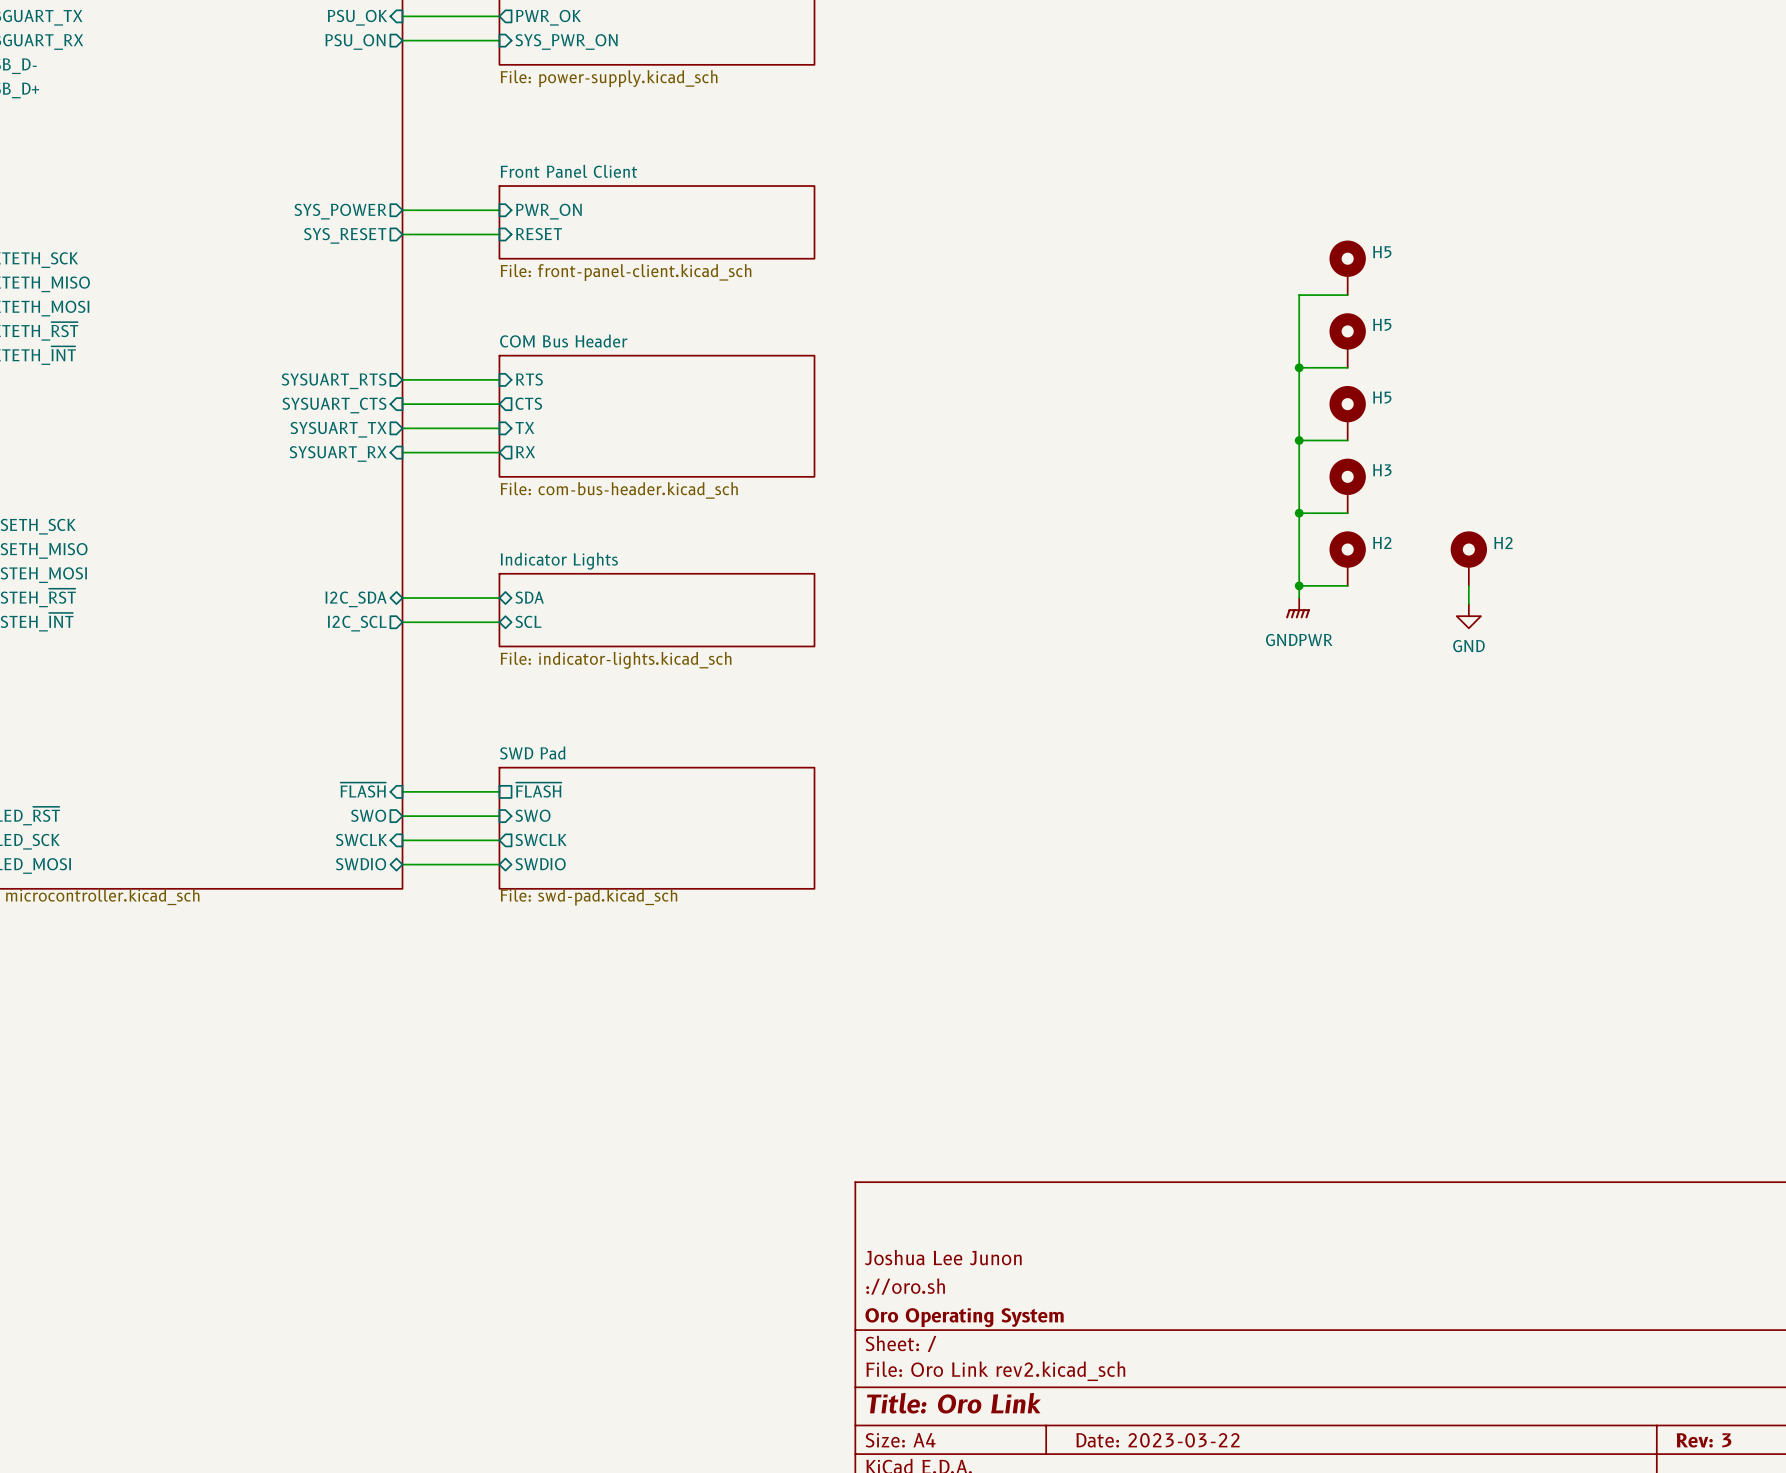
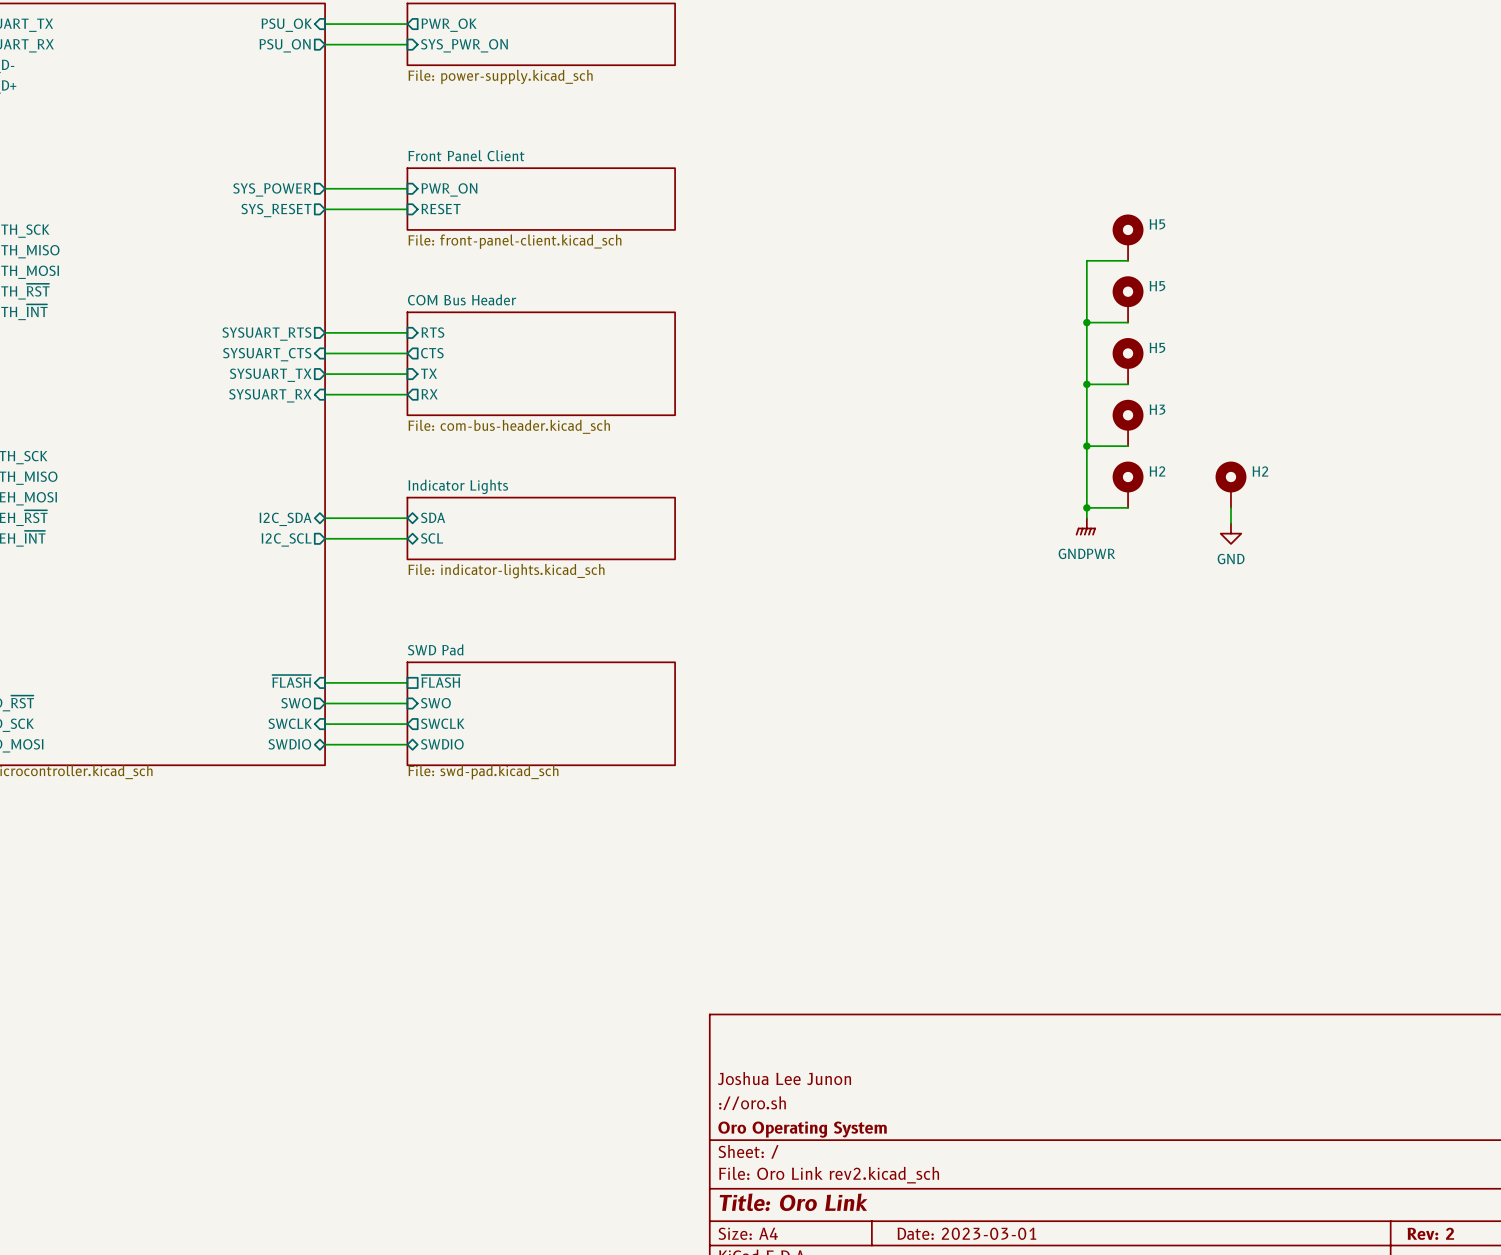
title block: Date: 2023-03-22 (1158, 1440) -> Date: 2023-03-01 (966, 1233)
title block: Rev: 3 (1704, 1440) -> Rev: 2 (1430, 1233)

